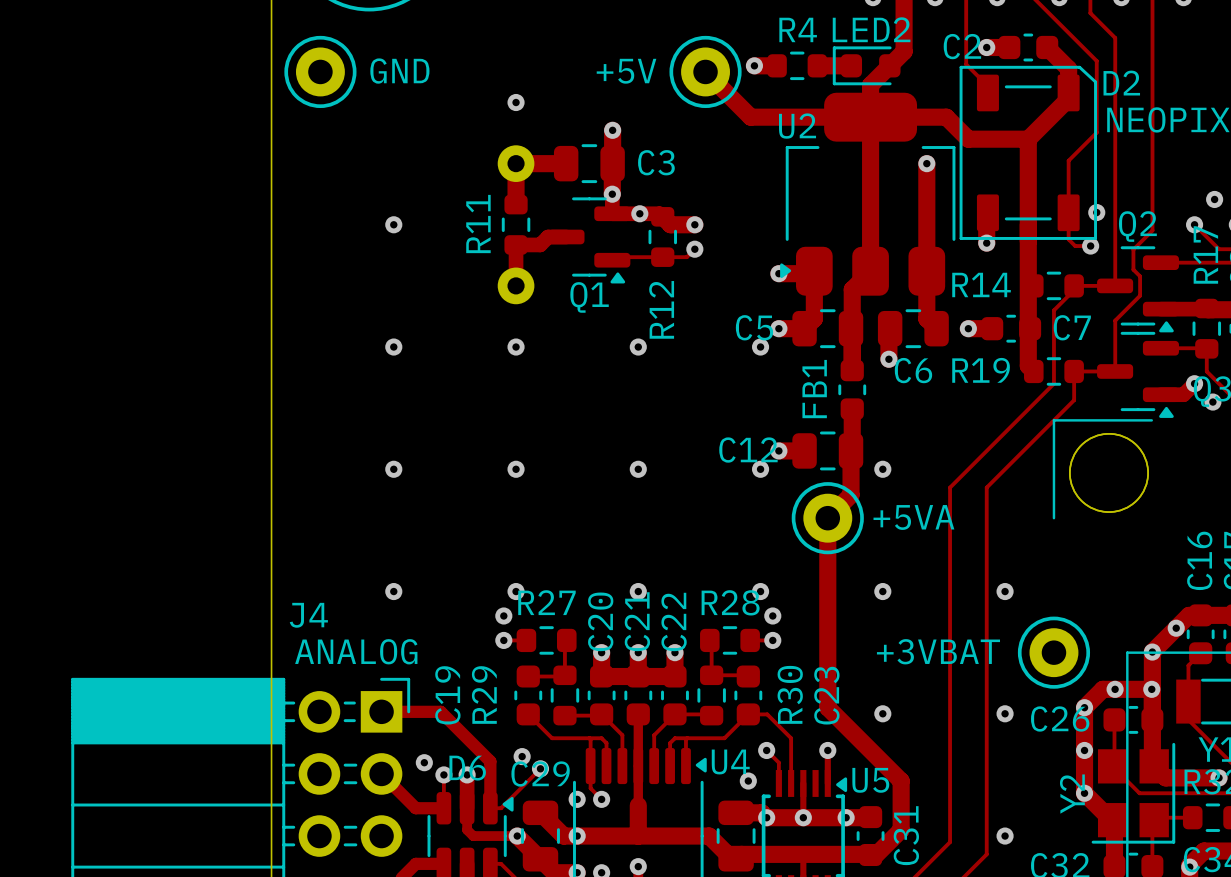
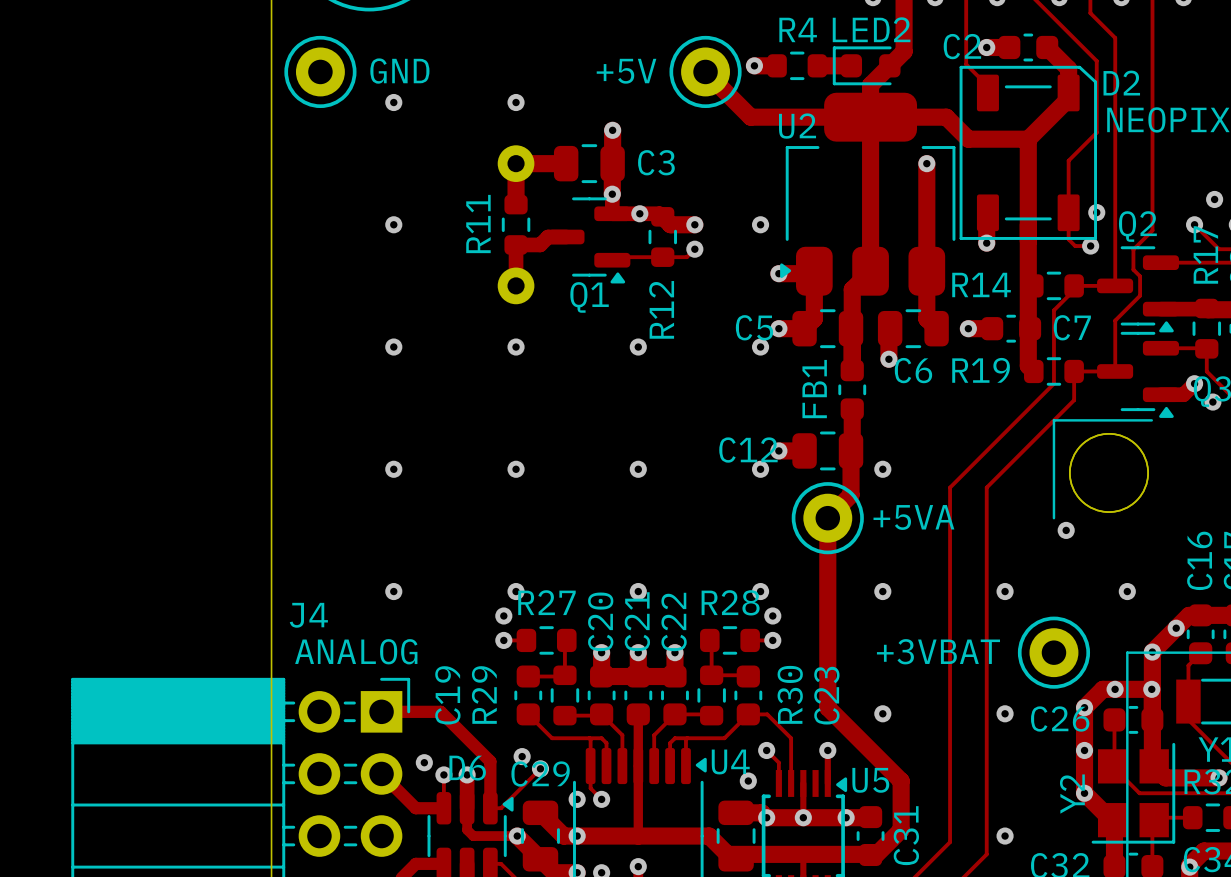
via: none -> (393, 102)
via: none -> (760, 224)
via: none -> (1066, 530)
via: none -> (1127, 591)
track width: thick (638, 805) (638, 836) -> thin (638, 805) (638, 836)

